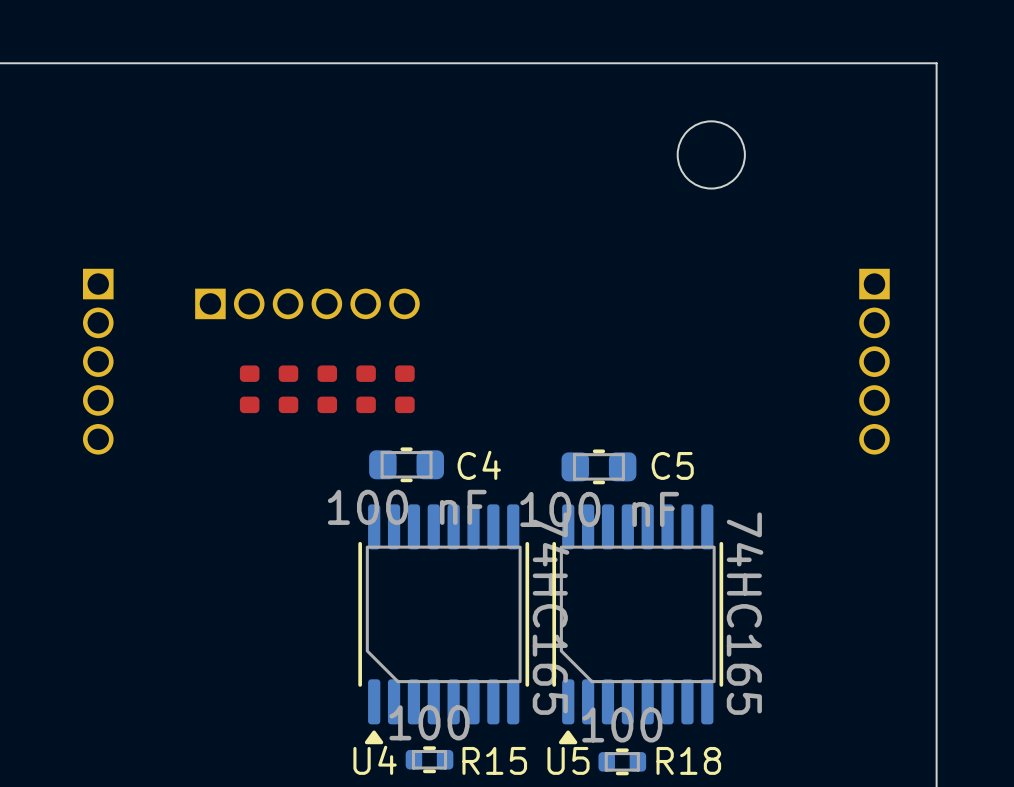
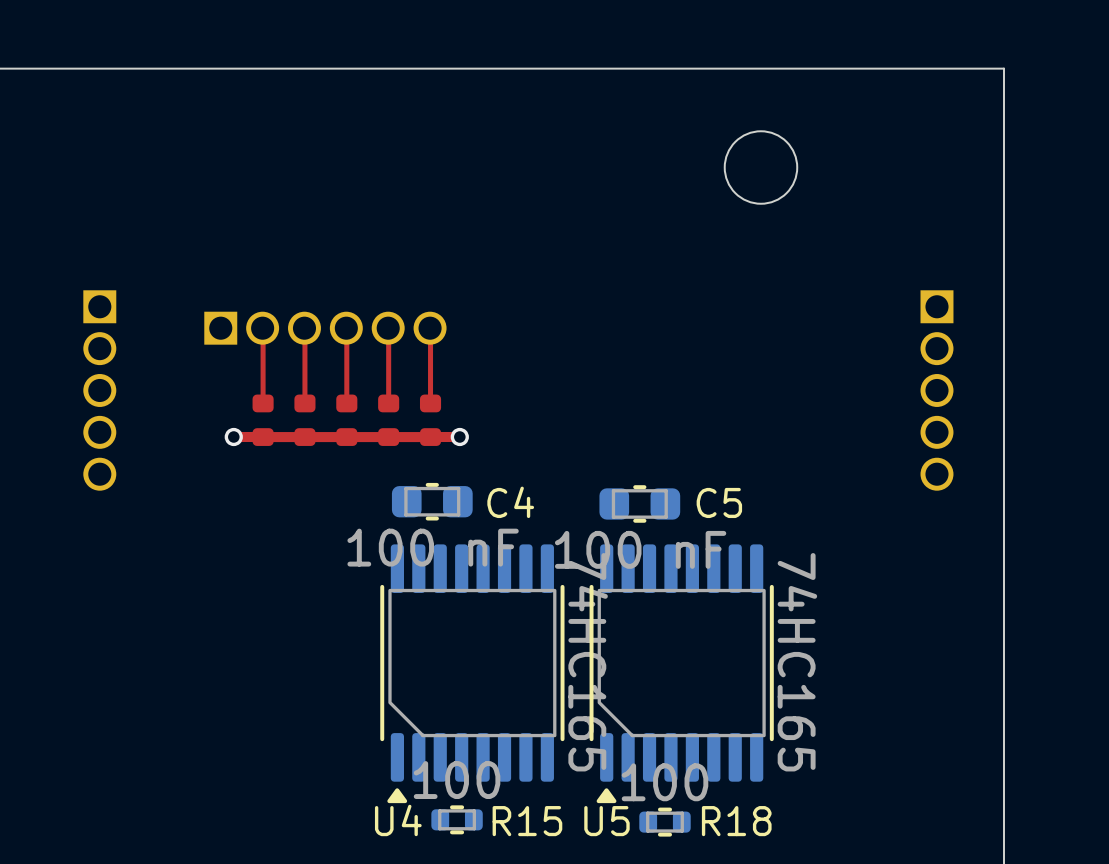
top track: none -> (263, 328) (263, 403)
top track: none -> (304, 328) (304, 403)
top track: none -> (346, 328) (346, 403)
top track: none -> (388, 328) (388, 403)
top track: none -> (430, 328) (430, 403)
via: none -> (233, 436)
top track: none -> (459, 436) (233, 436)
via: none -> (459, 436)

